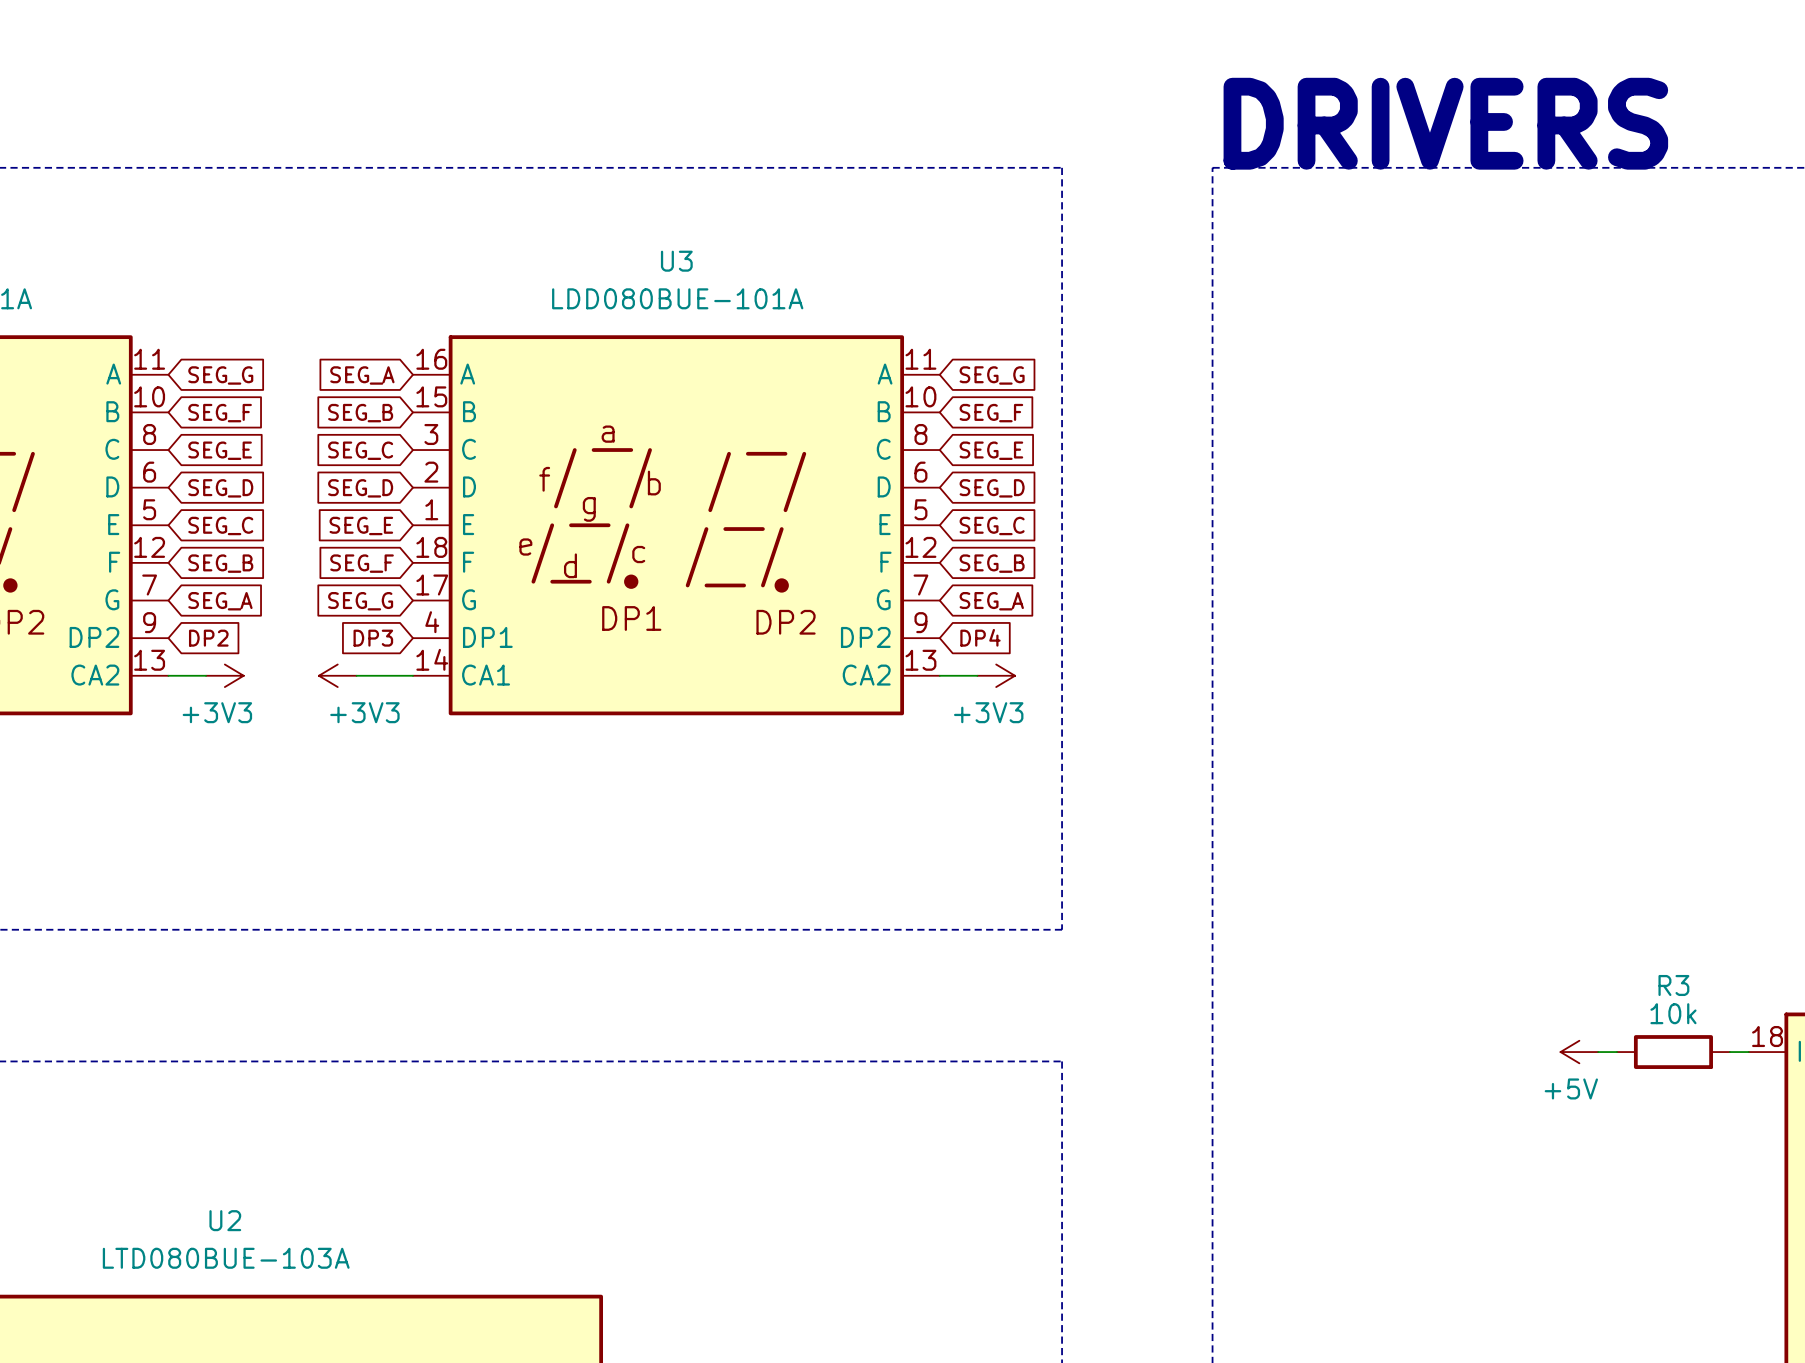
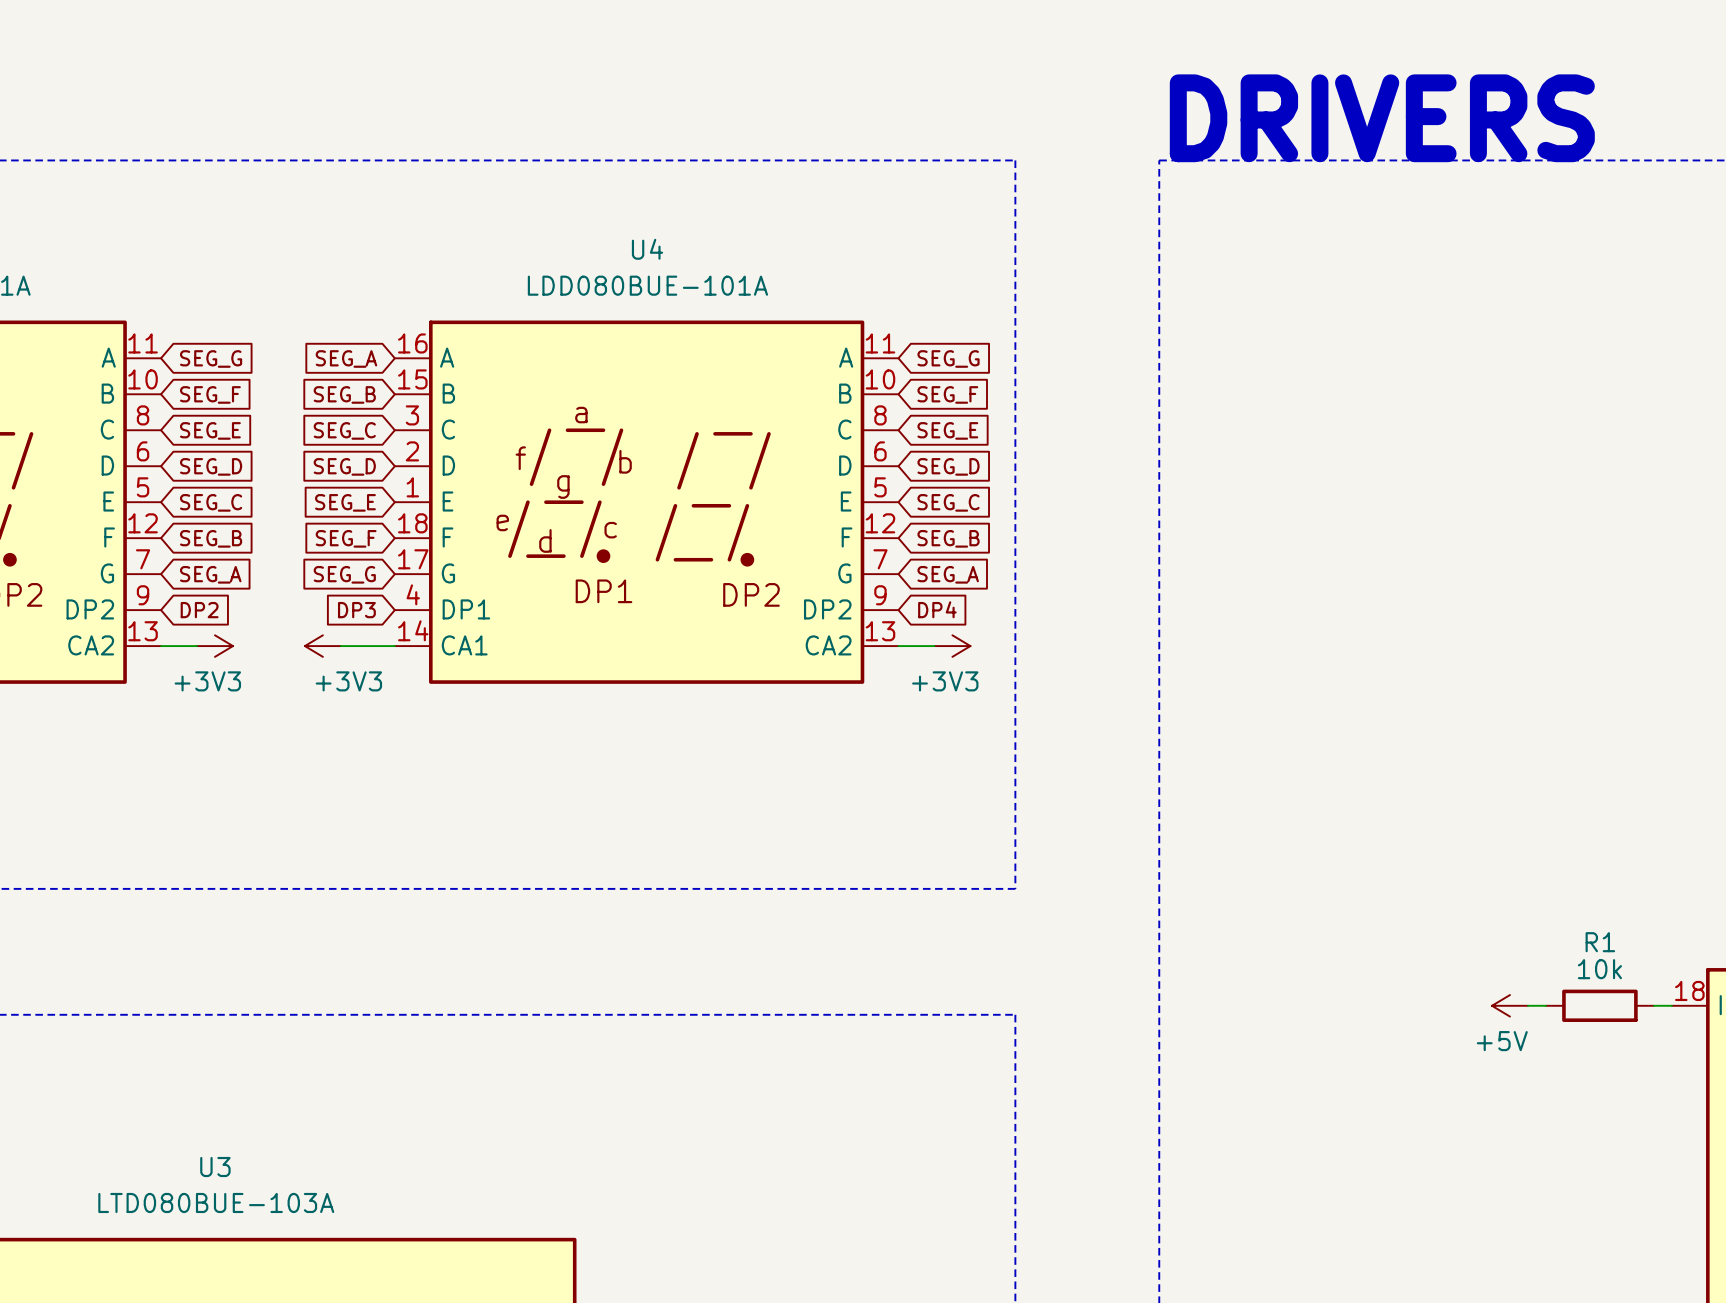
U3 name: U3 (676, 261) -> U4 (647, 249)
R3 name: R3 (1673, 985) -> R1 (1600, 942)
U2 name: U2 (225, 1220) -> U3 (215, 1167)

